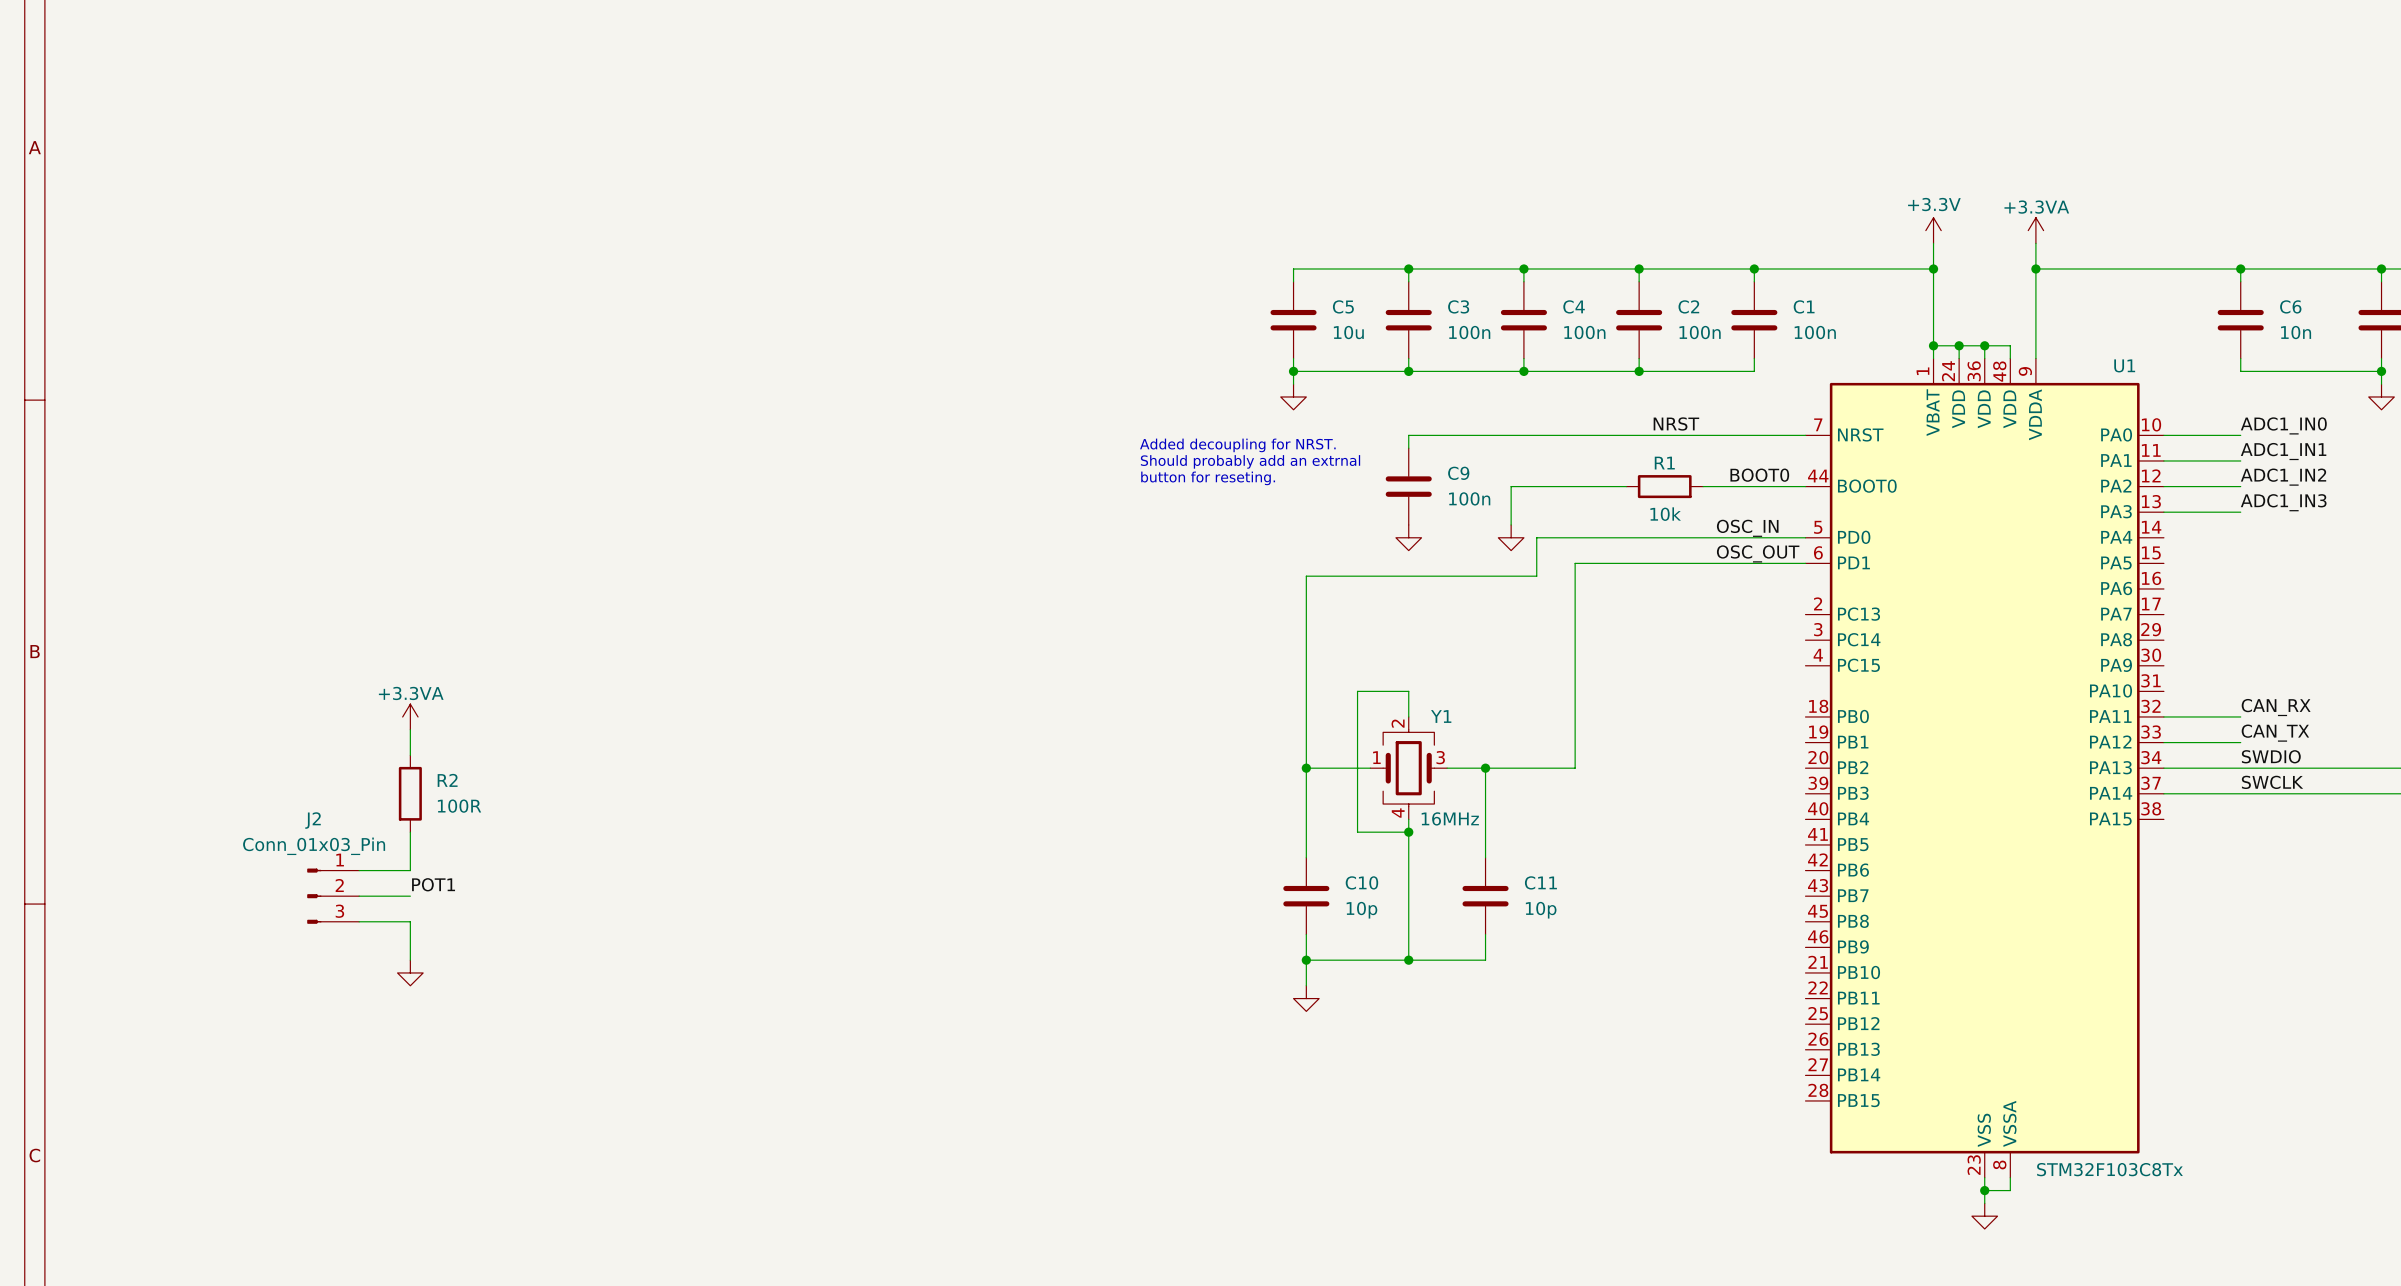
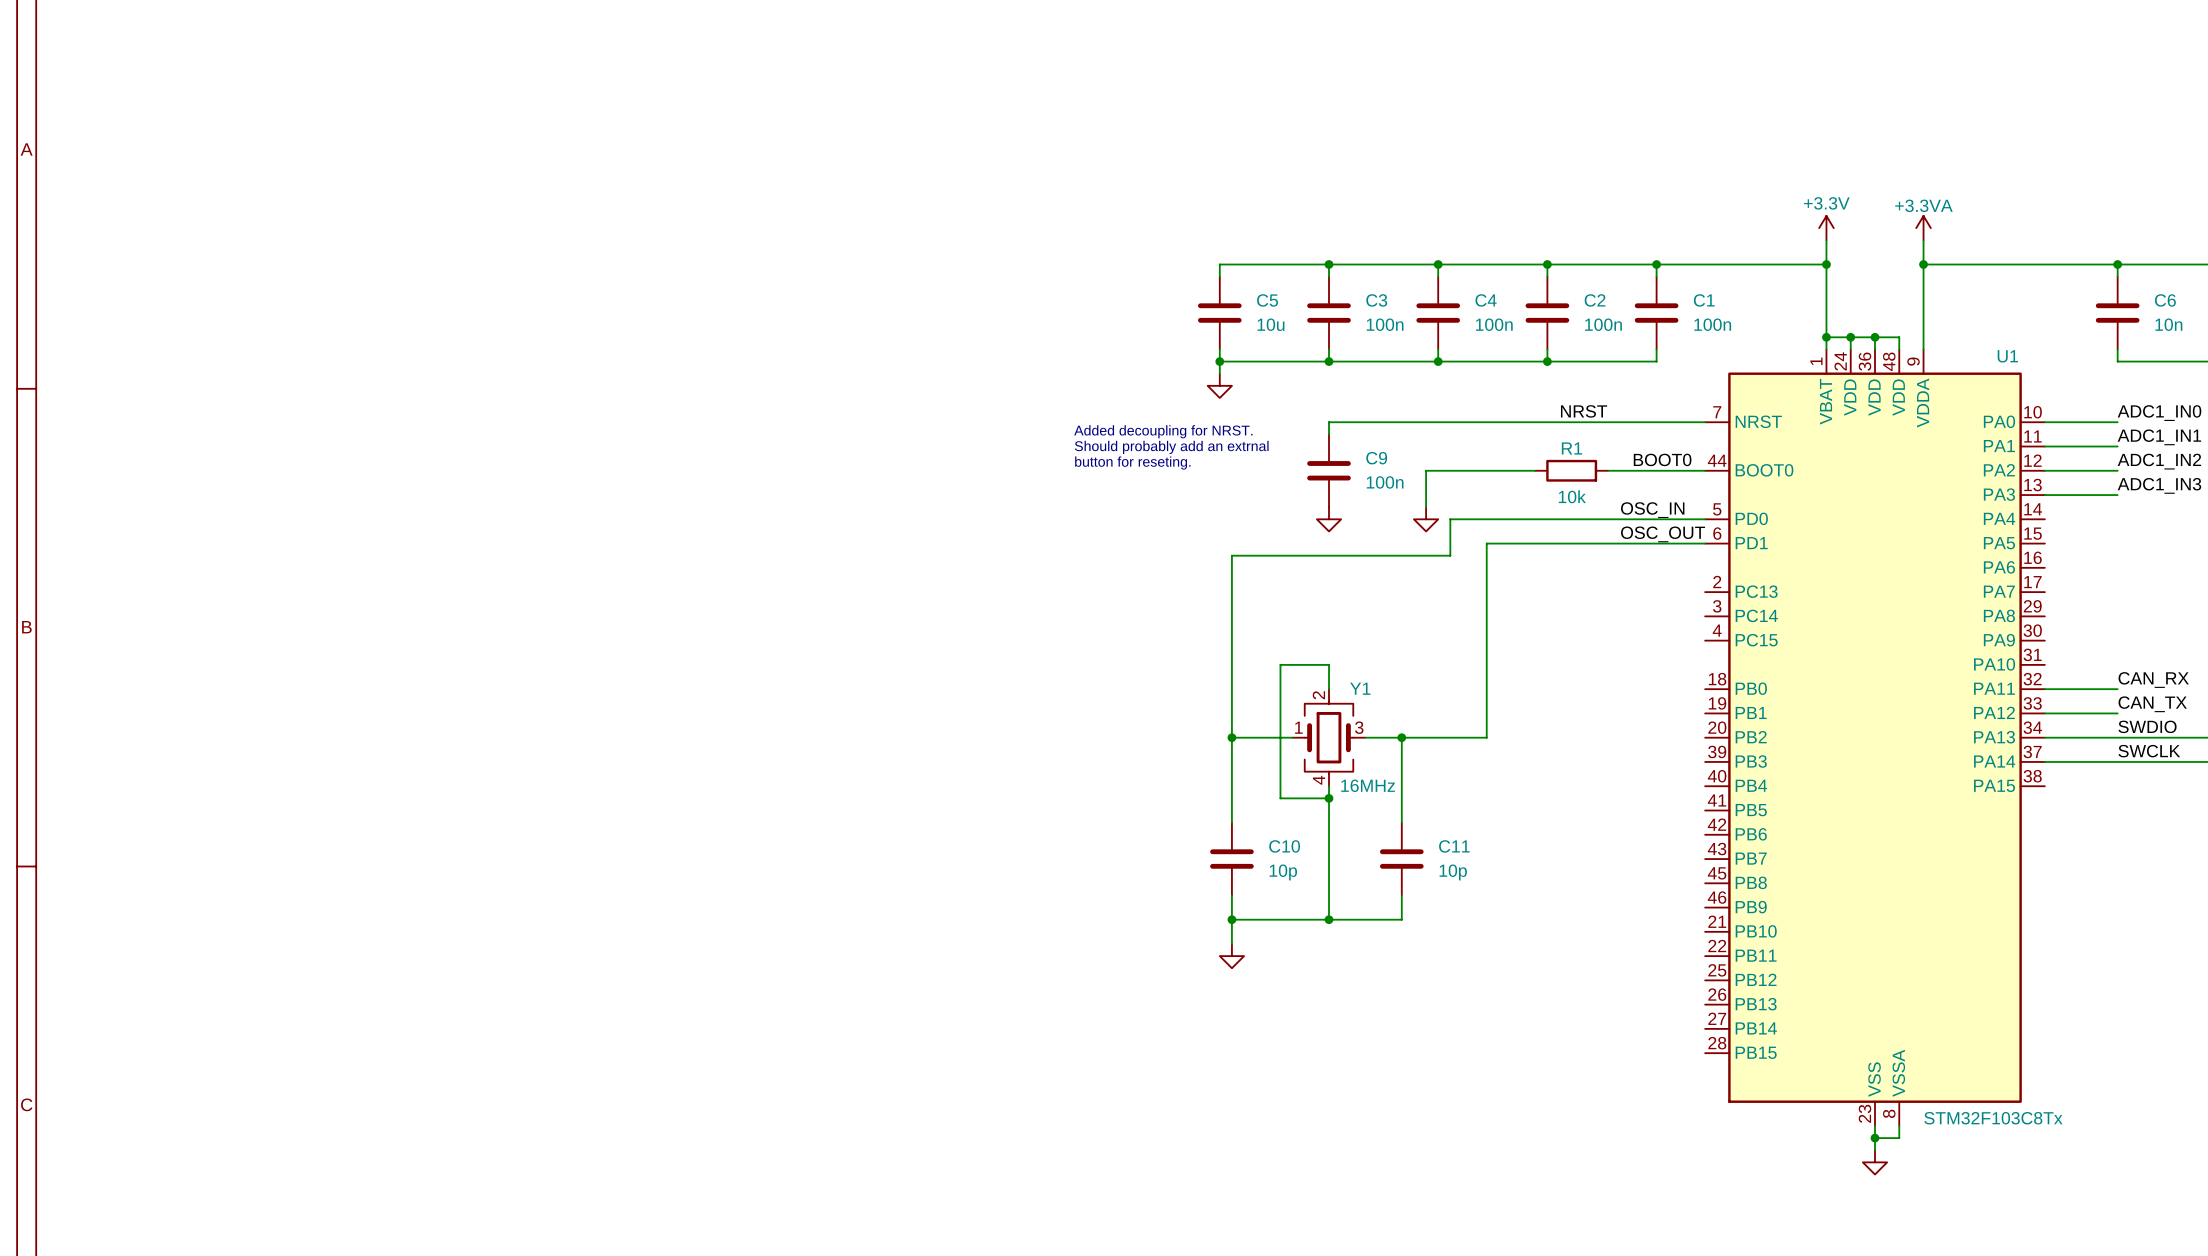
power symbol: +3.3VA (410, 716) -> none
wire: (410, 729) (410, 755) -> none
R2: 100R (410, 793) -> none
wire: (410, 832) (410, 870) (359, 870) -> none
label: POT1 (433, 884) -> none
J2: Conn_01x03_Pin (333, 896) -> none
wire: (359, 896) (410, 896) -> none
wire: (359, 921) (410, 921) (410, 960) -> none
power symbol: (410, 972) -> none

